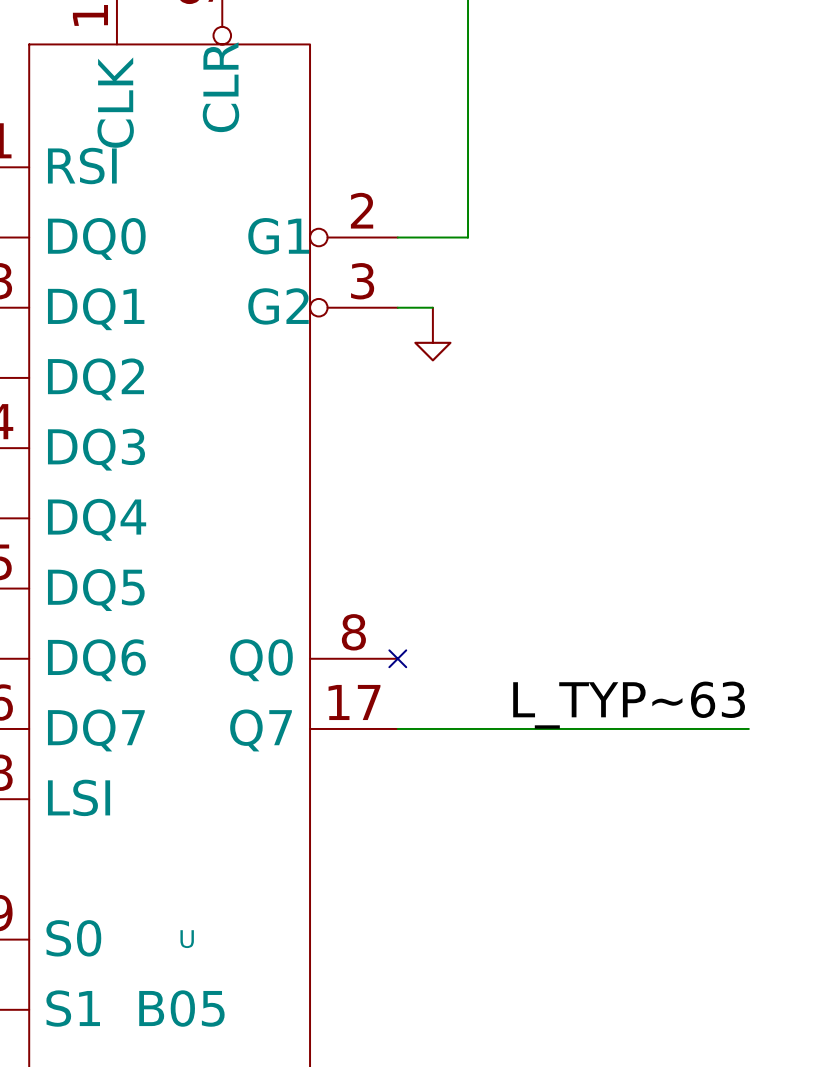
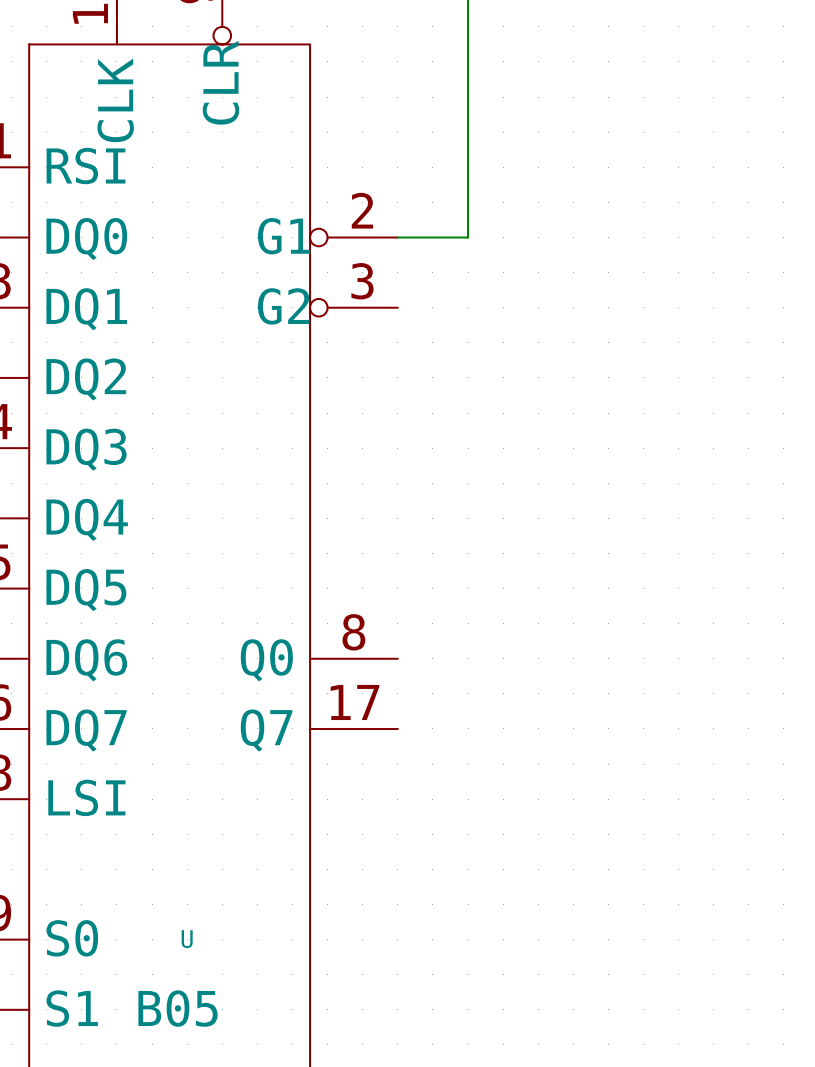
wire: (397, 307) (432, 307) -> none
power symbol: (432, 334) -> none
no-connect mark: (397, 658) -> none
label: L_TYP~63 (629, 705) -> none
wire: (397, 728) (748, 728) -> none

